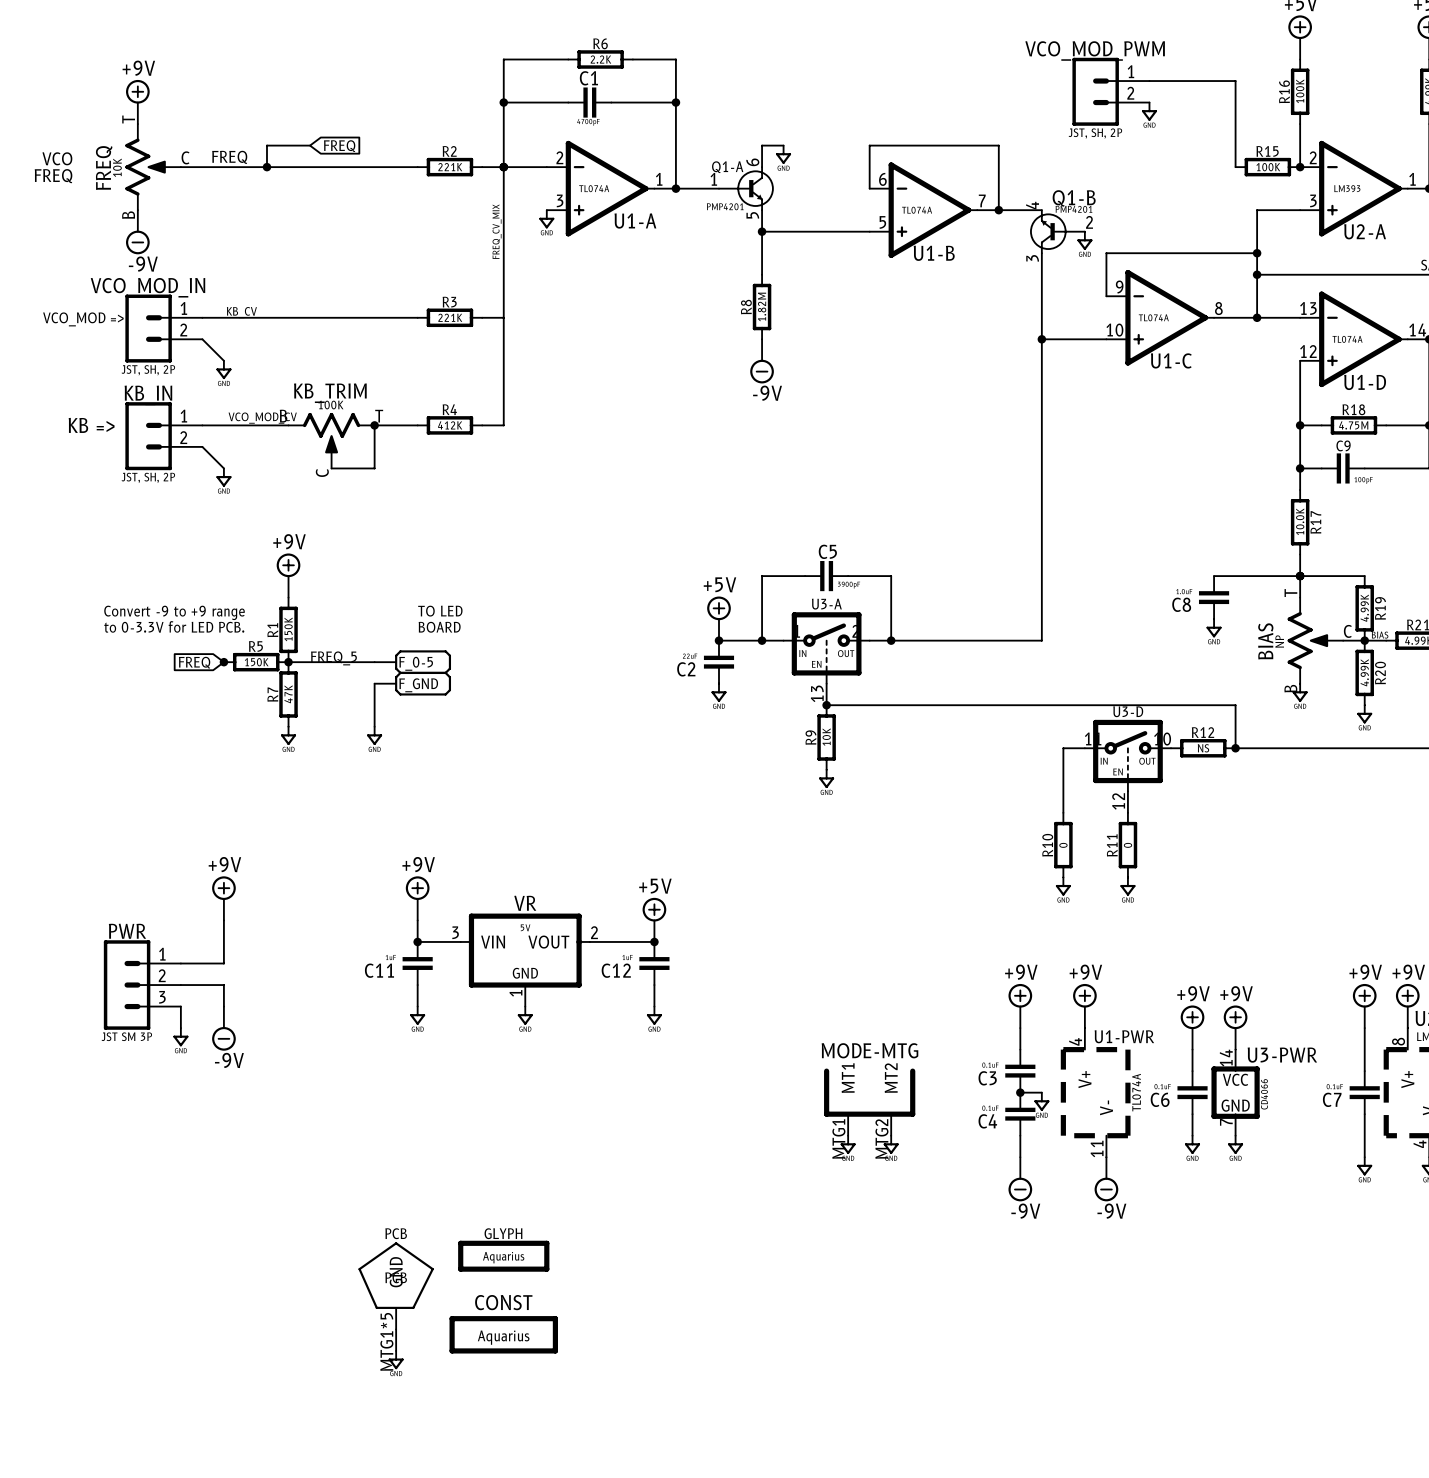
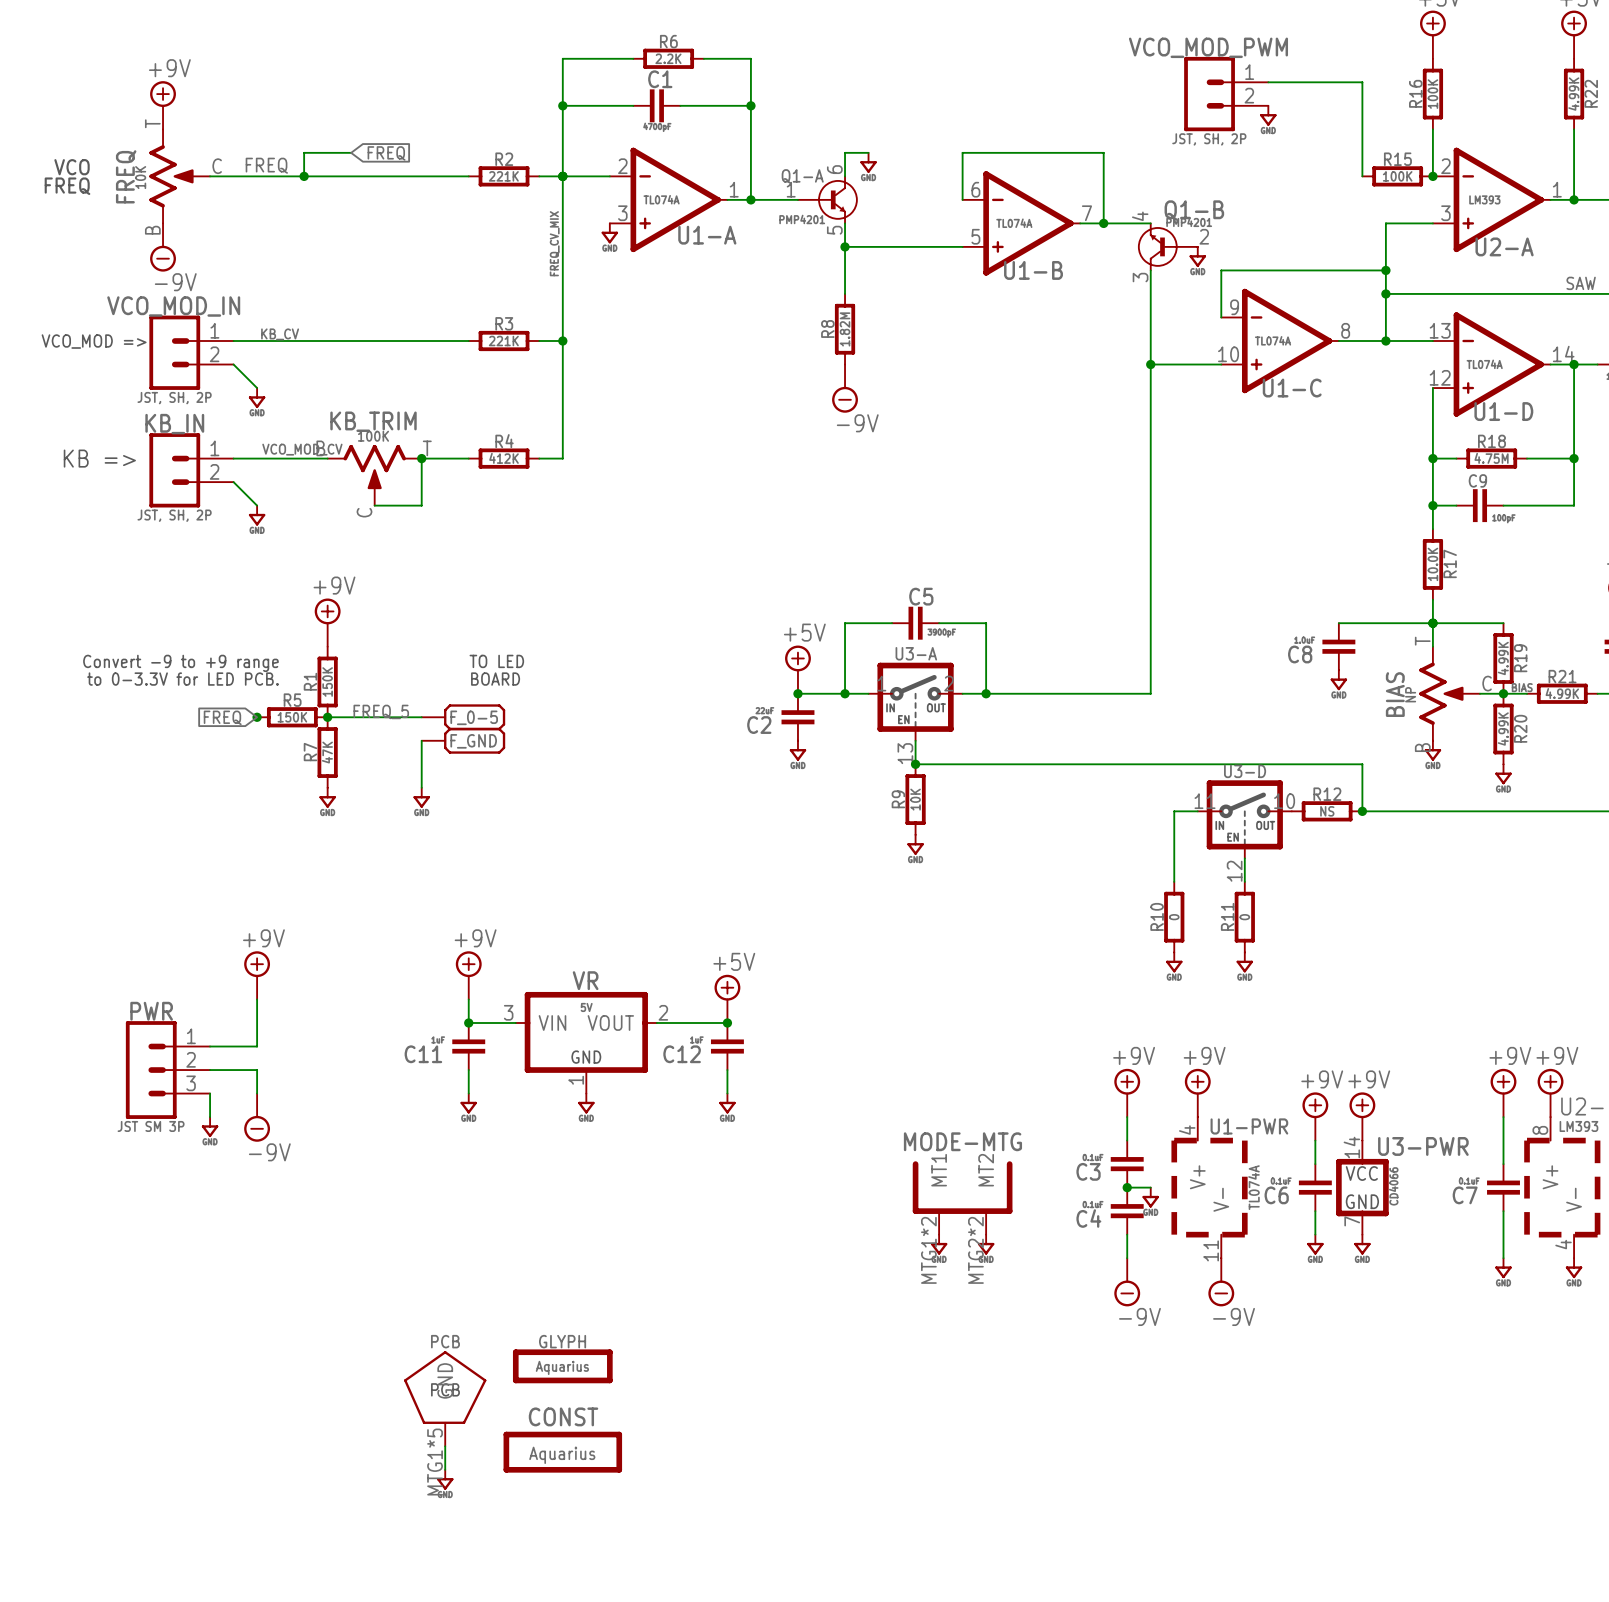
junction: none -> (562, 341)
MODE-MTG pin number: MTG1 (838, 1139) -> MTG1*2 (928, 1250)
MODE-MTG pin number: MTG2 (881, 1139) -> MTG2*2 (975, 1250)

